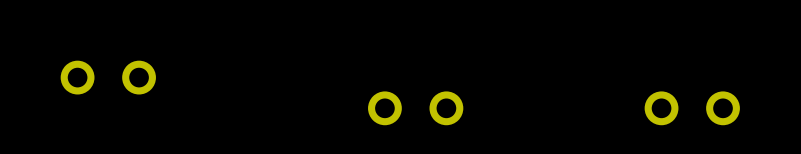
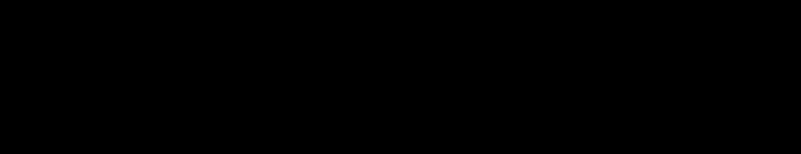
part: (108, 77) -> none
part: (415, 108) -> none
part: (692, 108) -> none

